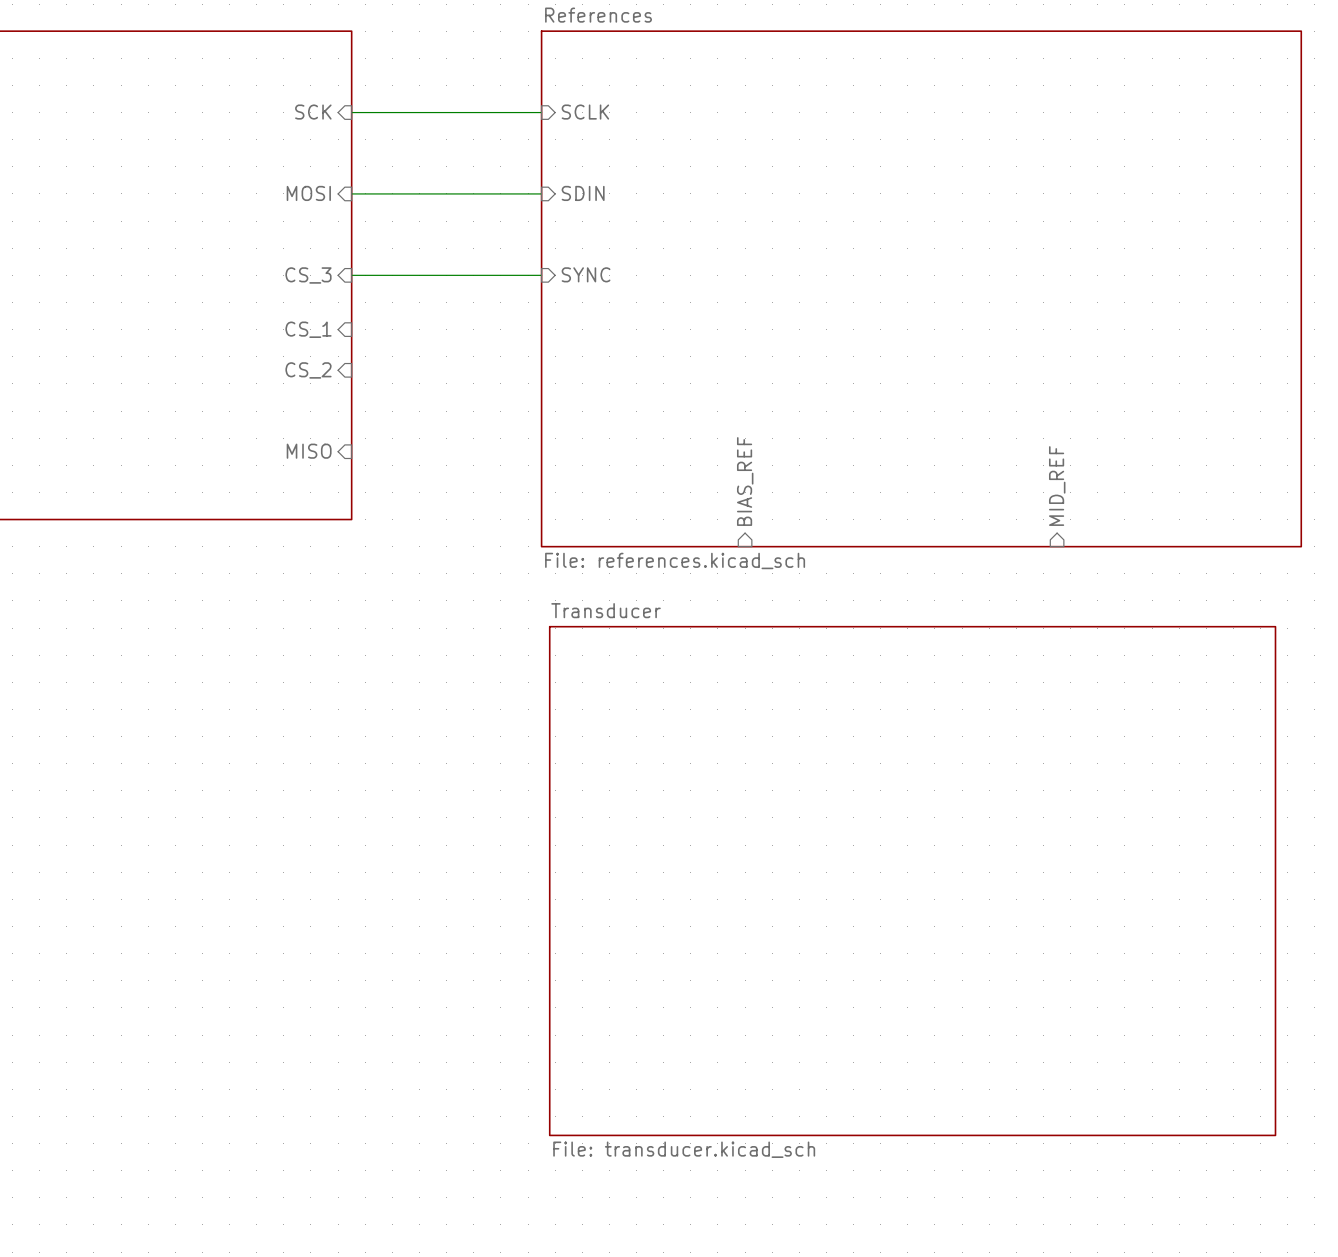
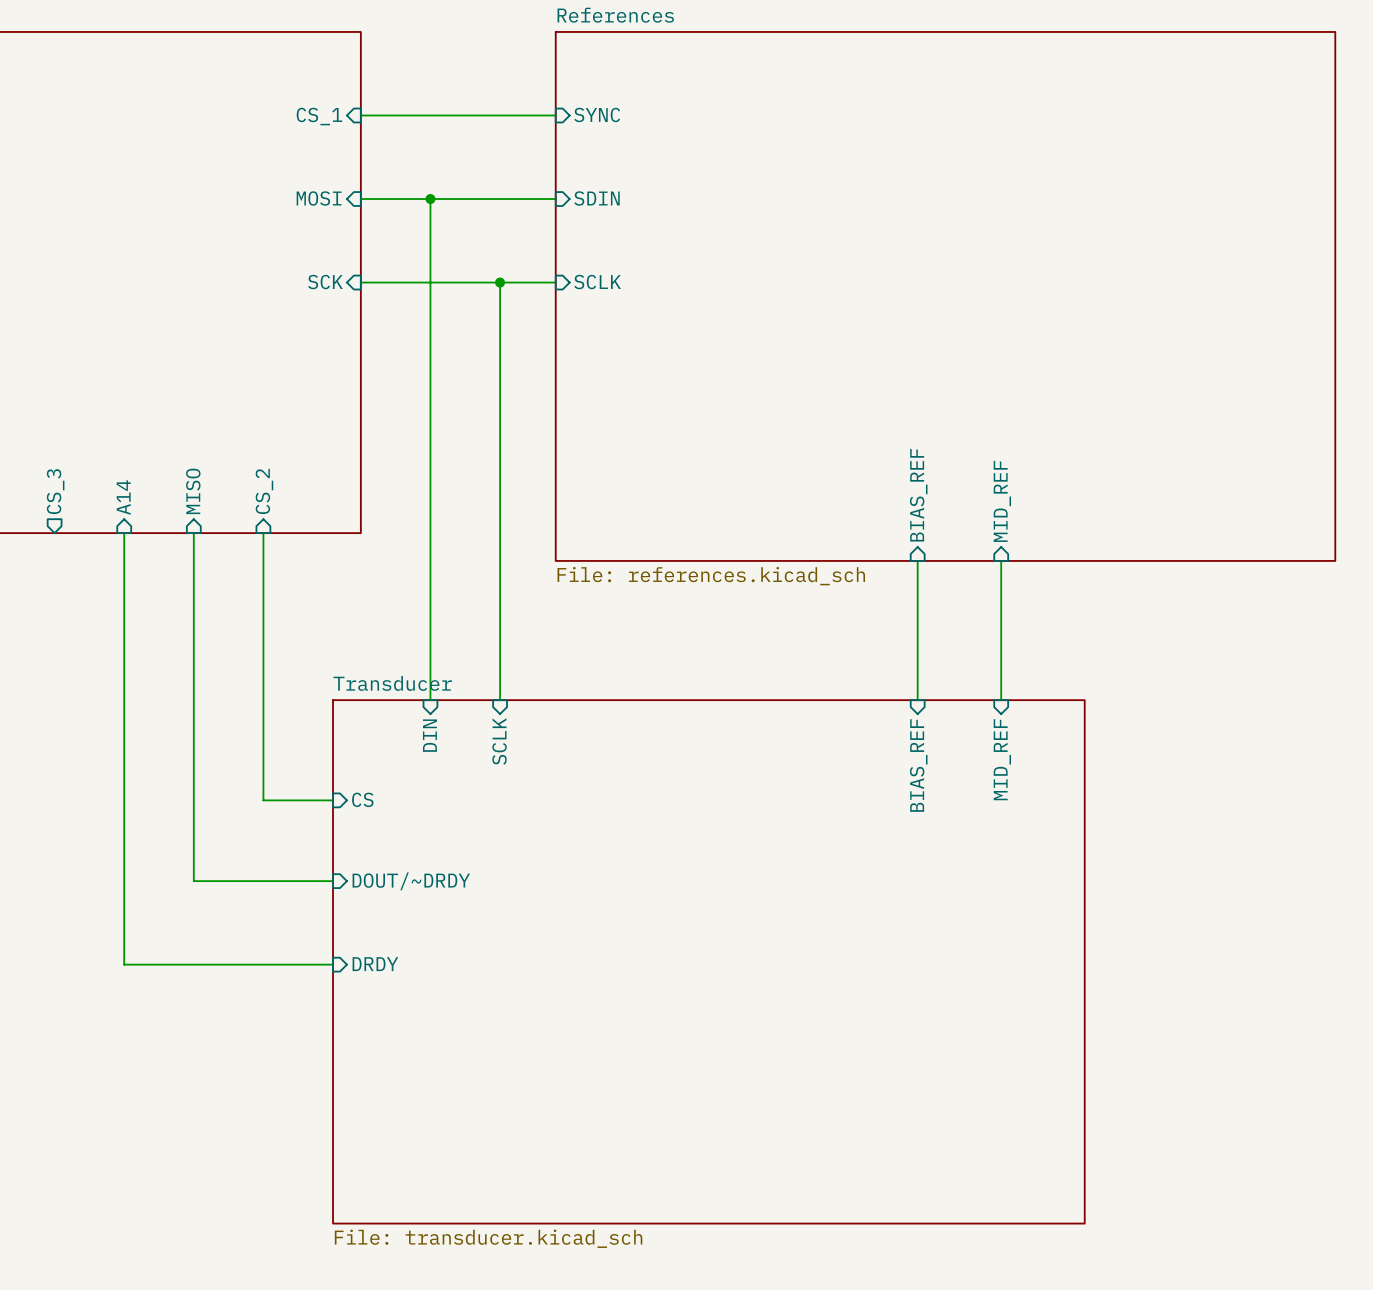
sheet pin: SCK (313, 112) -> CS_1 (319, 116)
sheet pin: SCLK (585, 112) -> SYNC (597, 114)
wire: none -> (430, 199) (430, 700)
junction: none -> (430, 199)
sheet pin: SYNC (586, 274) -> SCLK (597, 282)
sheet pin: CS_3 (308, 275) -> SCK (325, 282)
wire: none -> (500, 282) (500, 700)
junction: none -> (500, 282)
sheet pin: CS_1 (308, 329) -> none
sheet pin rotation: 0° (308, 370) -> 90° clockwise (264, 491)
sheet pin position: CS_2 (308, 370) -> CS_2 (264, 491)
sheet pin rotation: 0° (309, 451) -> 90° clockwise (193, 491)
sheet pin position: MISO (309, 451) -> MISO (193, 491)
sheet pin: none -> CS_3 (55, 491)
sheet pin: BIAS_REF (745, 481) -> none
sheet pin: none -> BIAS_REF (918, 495)
sheet pin: none -> A14 (123, 497)
sheet pin position: MID_REF (1057, 486) -> MID_REF (1002, 501)
wire: none -> (124, 533) (124, 964) (333, 964)
wire: none -> (193, 533) (193, 881) (333, 881)
wire: none -> (263, 533) (263, 800) (333, 800)
wire: none -> (917, 560) (917, 700)
wire: none -> (1001, 560) (1001, 700)
sheet pin: none -> DIN (429, 735)
sheet pin: none -> SCLK (499, 741)
sheet pin: none -> MID_REF (1002, 759)
sheet pin: none -> BIAS_REF (918, 765)
sheet pin: none -> CS (362, 799)
sheet pin: none -> DOUT/~DRDY (411, 881)
sheet Transducer: File: transducer.kicad_sch (912, 881) -> none
sheet Transducer: none -> File: transducer.kicad_sch (708, 961)
sheet pin: none -> DRDY (375, 964)

